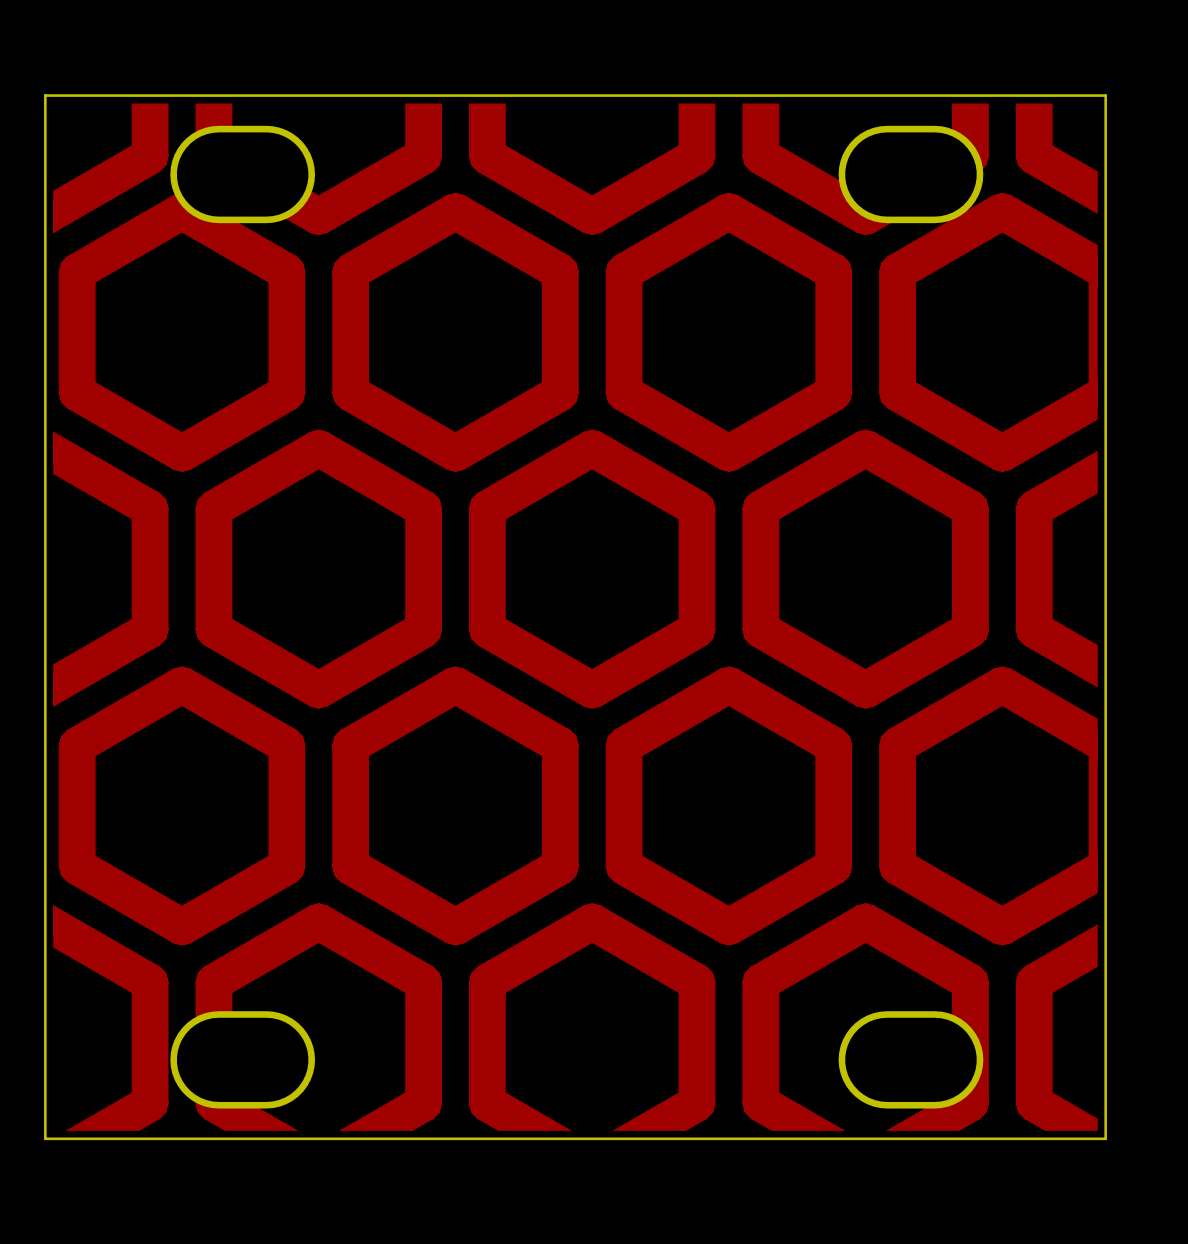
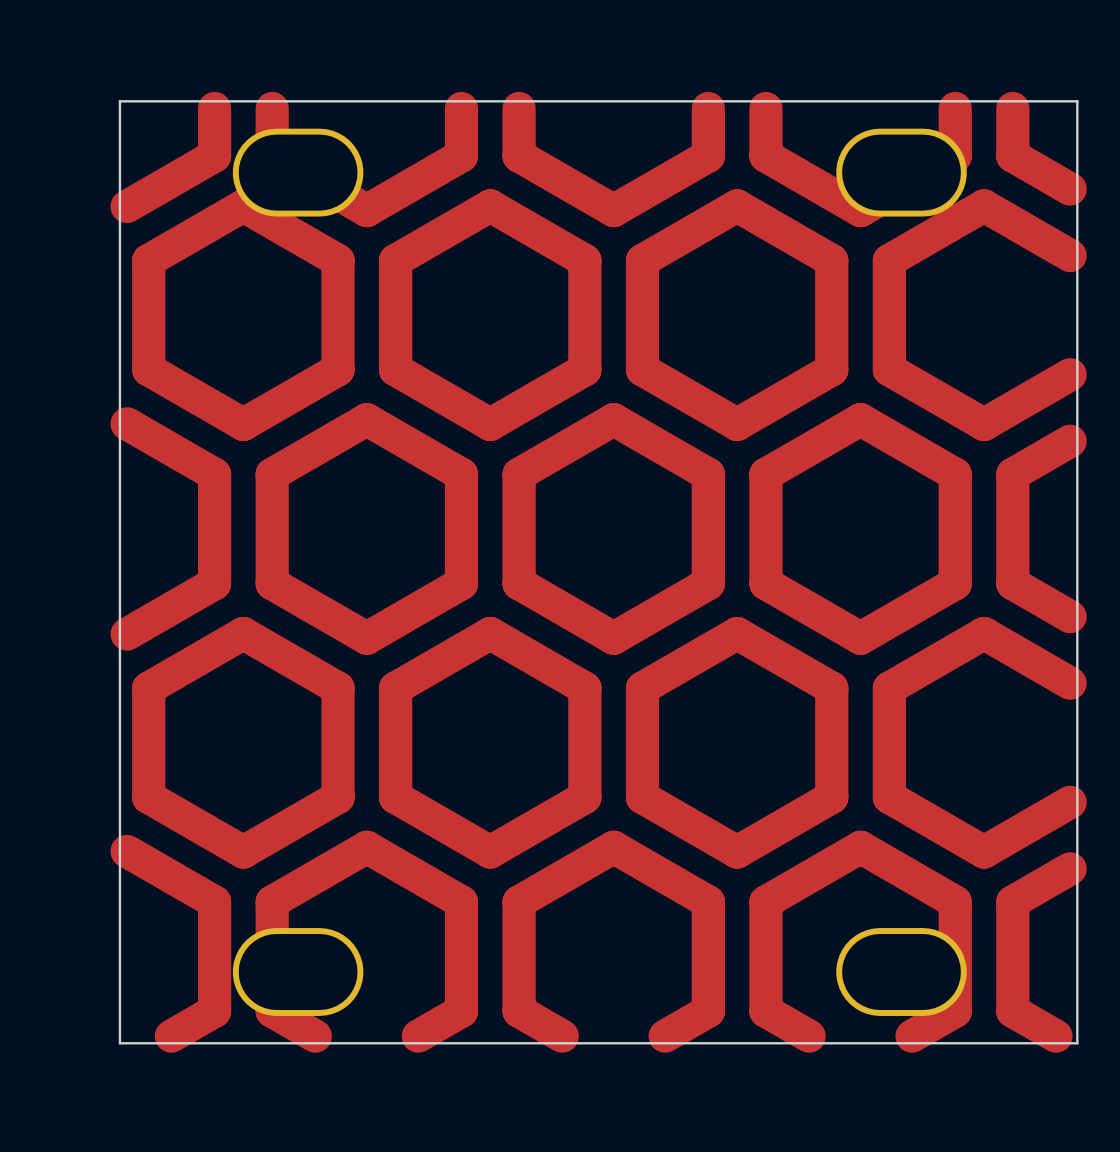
drawing: [53, 103, 1098, 1131] -> none
track: none -> (214, 108) (214, 155) (127, 206)
track: none -> (272, 108) (272, 155) (366, 210) (461, 155) (461, 108)
track: none -> (519, 108) (519, 155) (613, 210) (708, 155) (708, 108)
track: none -> (765, 108) (765, 155) (860, 210) (955, 155) (955, 108)
track: none -> (1012, 108) (1012, 155) (1070, 189)
track: none -> (243, 205) (338, 260) (338, 369) (243, 424) (148, 369) (148, 260) (243, 205)
track: none -> (490, 205) (584, 260) (584, 369) (490, 424) (395, 369) (395, 260) (490, 205)
track: none -> (737, 205) (831, 260) (831, 369) (737, 424) (642, 369) (642, 260) (737, 205)
track: none -> (1070, 255) (984, 205) (889, 260) (889, 369) (984, 424) (1070, 374)
track: none -> (366, 419) (272, 474) (272, 583) (366, 638) (461, 583) (461, 474) (366, 419)
track: none -> (613, 419) (708, 474) (708, 583) (613, 638) (519, 583) (519, 474) (613, 419)
track: none -> (860, 419) (955, 474) (955, 583) (860, 638) (765, 583) (765, 474) (860, 419)
track: none -> (127, 423) (214, 474) (214, 583) (127, 634)
track: none -> (1070, 441) (1012, 474) (1012, 583) (1070, 616)
track: none -> (243, 633) (148, 688) (148, 797) (243, 852) (338, 797) (338, 688) (243, 633)
track: none -> (490, 633) (584, 688) (584, 797) (490, 852) (395, 797) (395, 688) (490, 633)
track: none -> (737, 633) (831, 688) (831, 797) (737, 852) (642, 797) (642, 688) (737, 633)
track: none -> (1070, 683) (984, 633) (889, 688) (889, 797) (984, 852) (1070, 802)
track: none -> (127, 851) (214, 901) (214, 1011) (171, 1036)
track: none -> (1070, 868) (1012, 901) (1012, 1011) (1056, 1036)
track: none -> (315, 1036) (272, 1011) (272, 901) (366, 847) (461, 901) (461, 1011) (418, 1036)
track: none -> (562, 1036) (519, 1011) (519, 901) (613, 847) (708, 901) (708, 1011) (665, 1036)
track: none -> (809, 1036) (765, 1011) (765, 901) (860, 847) (955, 901) (955, 1011) (912, 1036)

